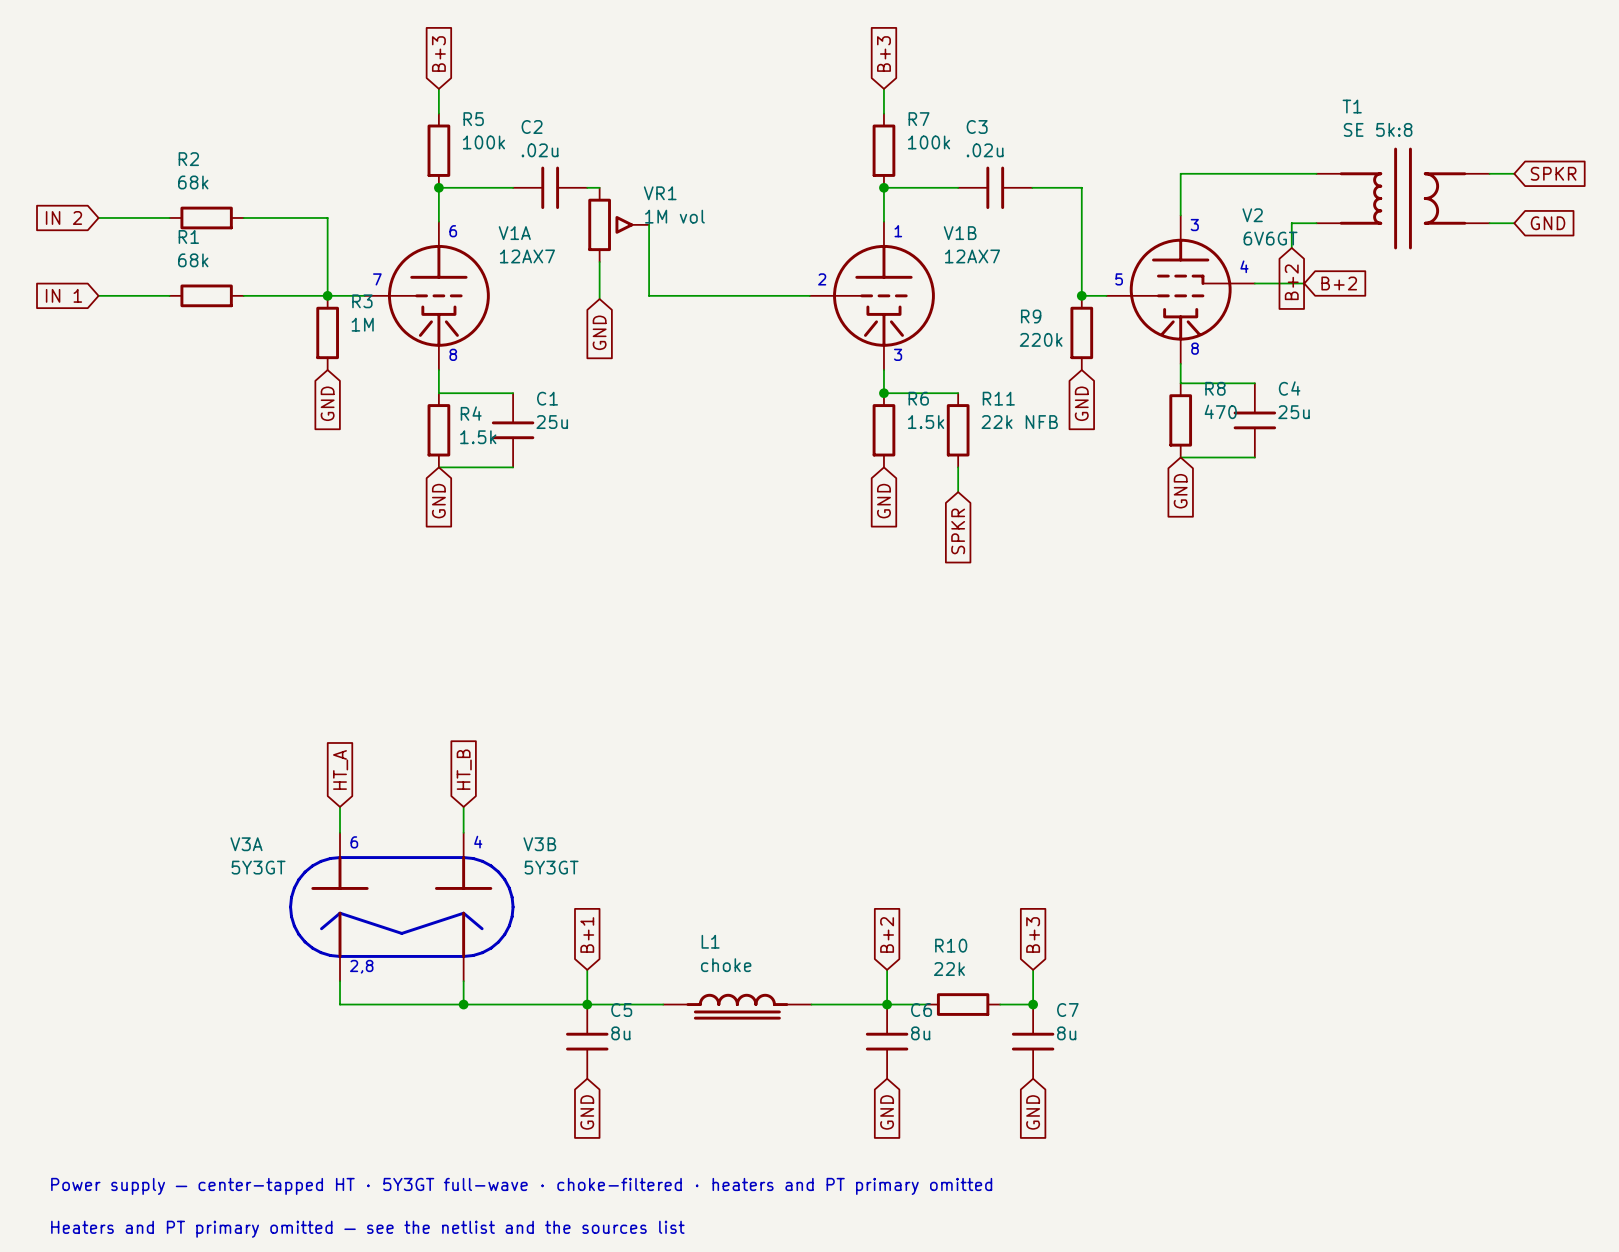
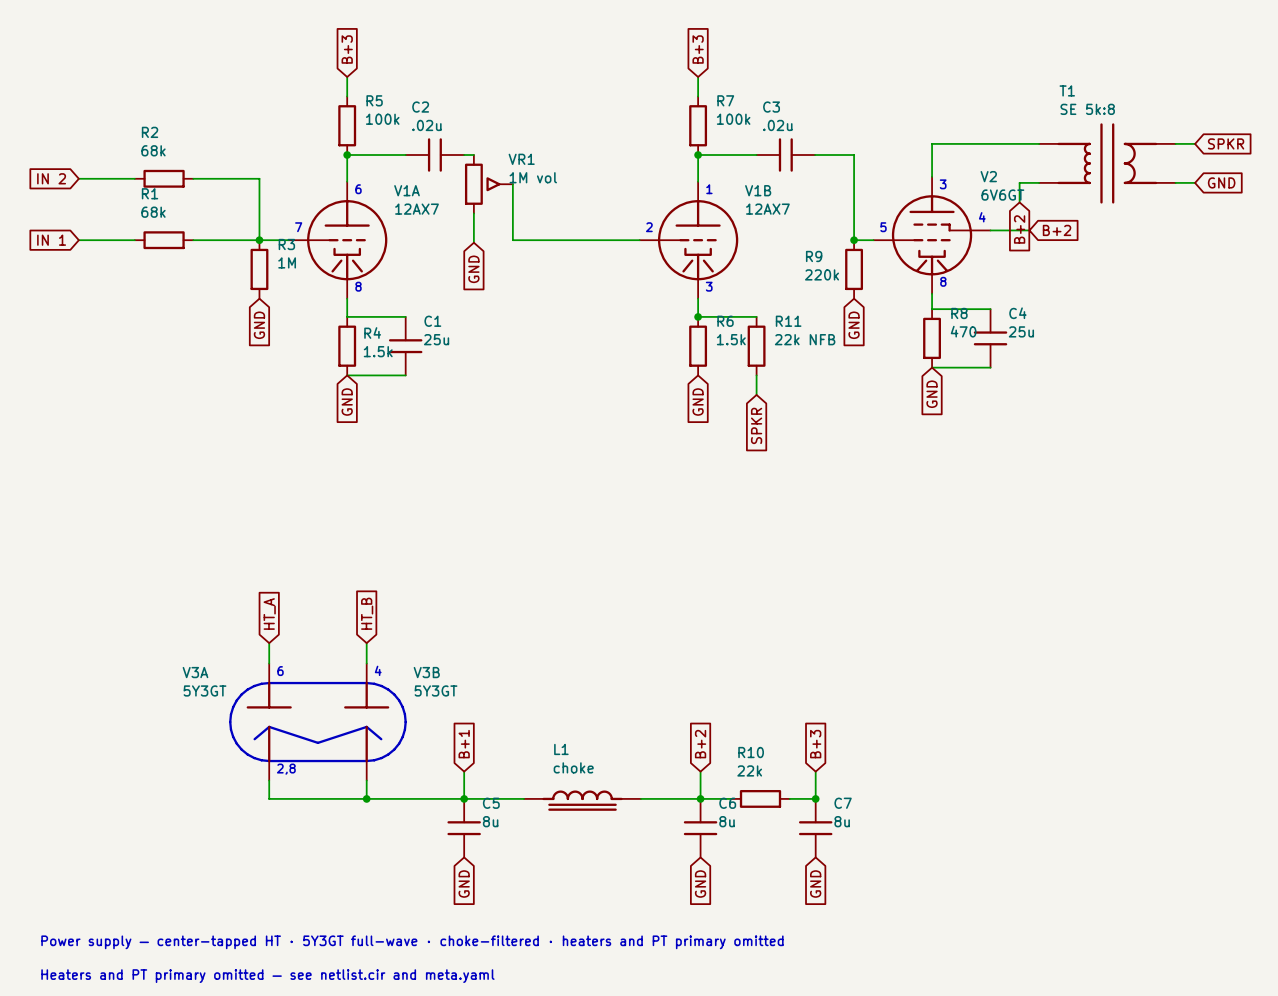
text: Heaters and PT primary omitted — see the netlist and the sources list (367, 1229) -> Heaters and PT primary omitted — see netlist.cir and meta.yaml (267, 976)

